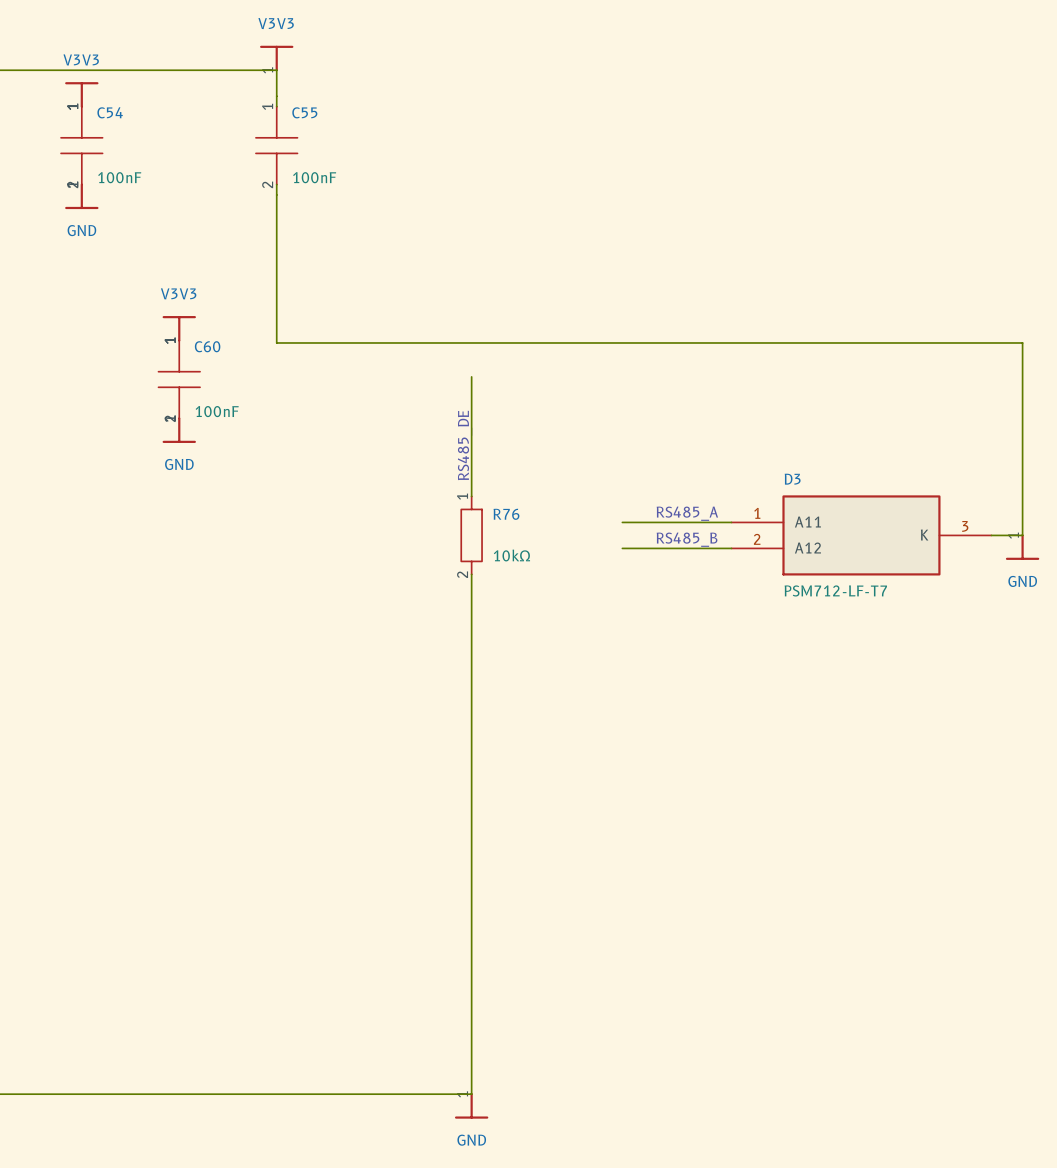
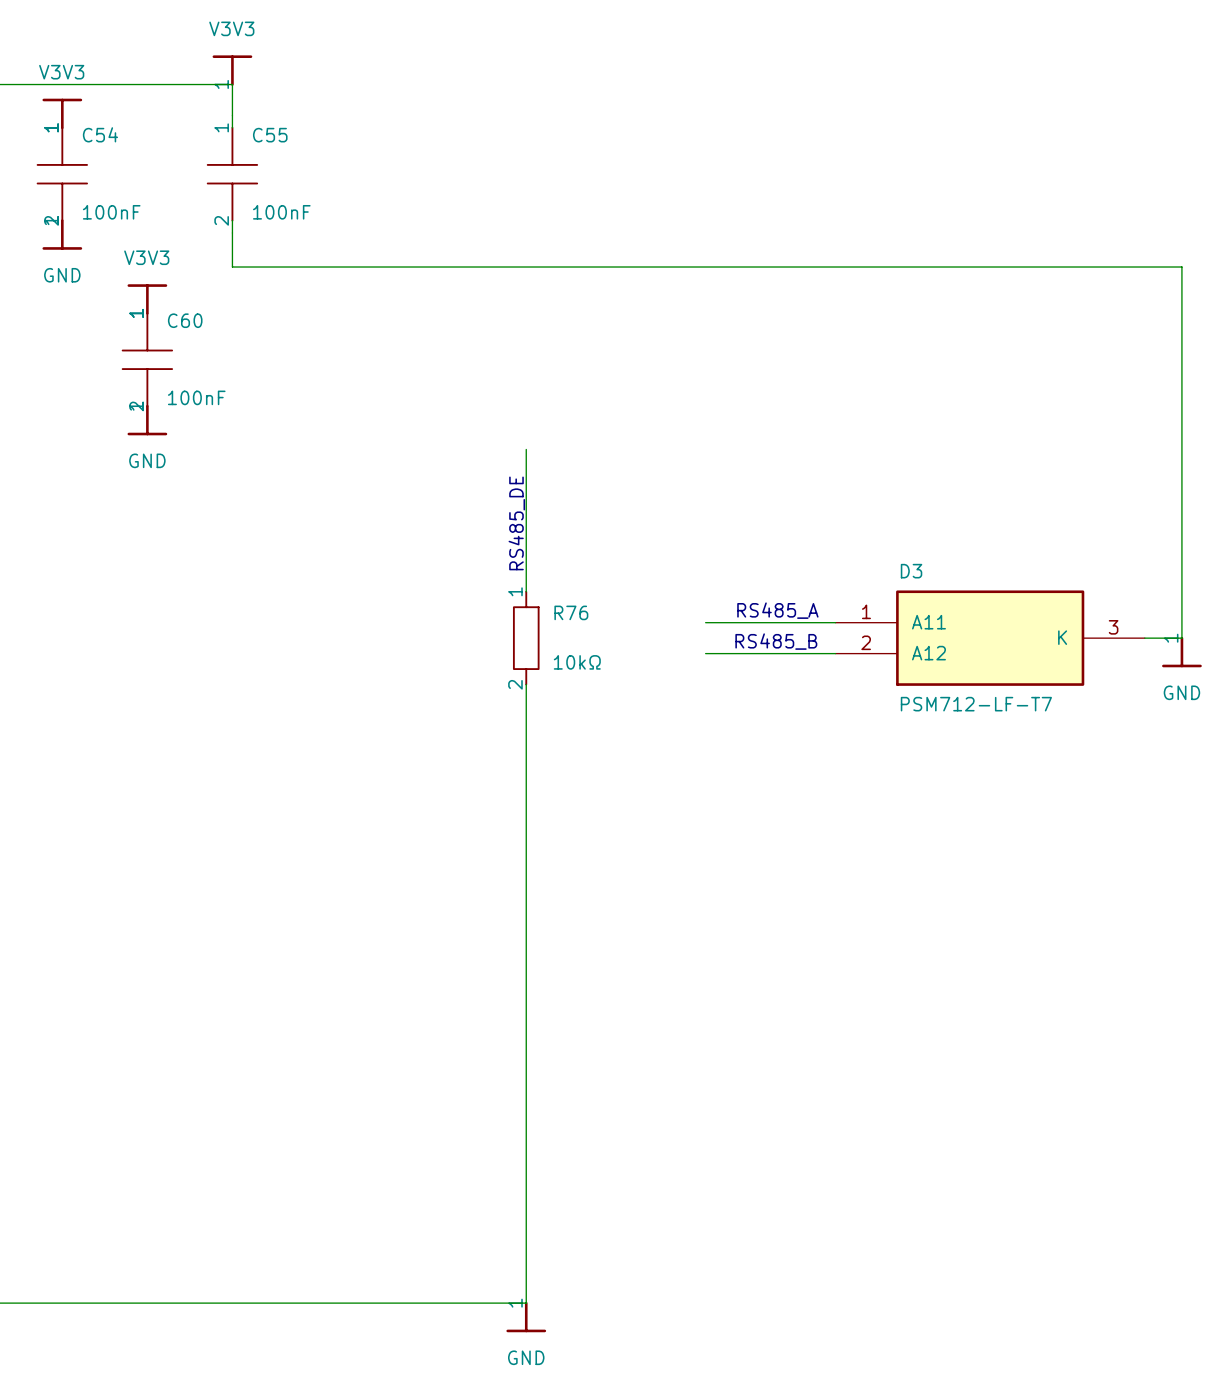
V3V3 position: (276, 58) -> (232, 70)
wire: (224, 70) (276, 70) (276, 106) -> (232, 84) (232, 127)
C55 position: (276, 145) -> (232, 174)
wire: (276, 184) (276, 342) (1022, 342) -> (232, 220) (232, 267) (1181, 267) (1181, 409)
V3V3 position: (179, 328) -> (147, 299)
C60 position: (179, 379) -> (147, 359)
GND position: (179, 430) -> (147, 420)

